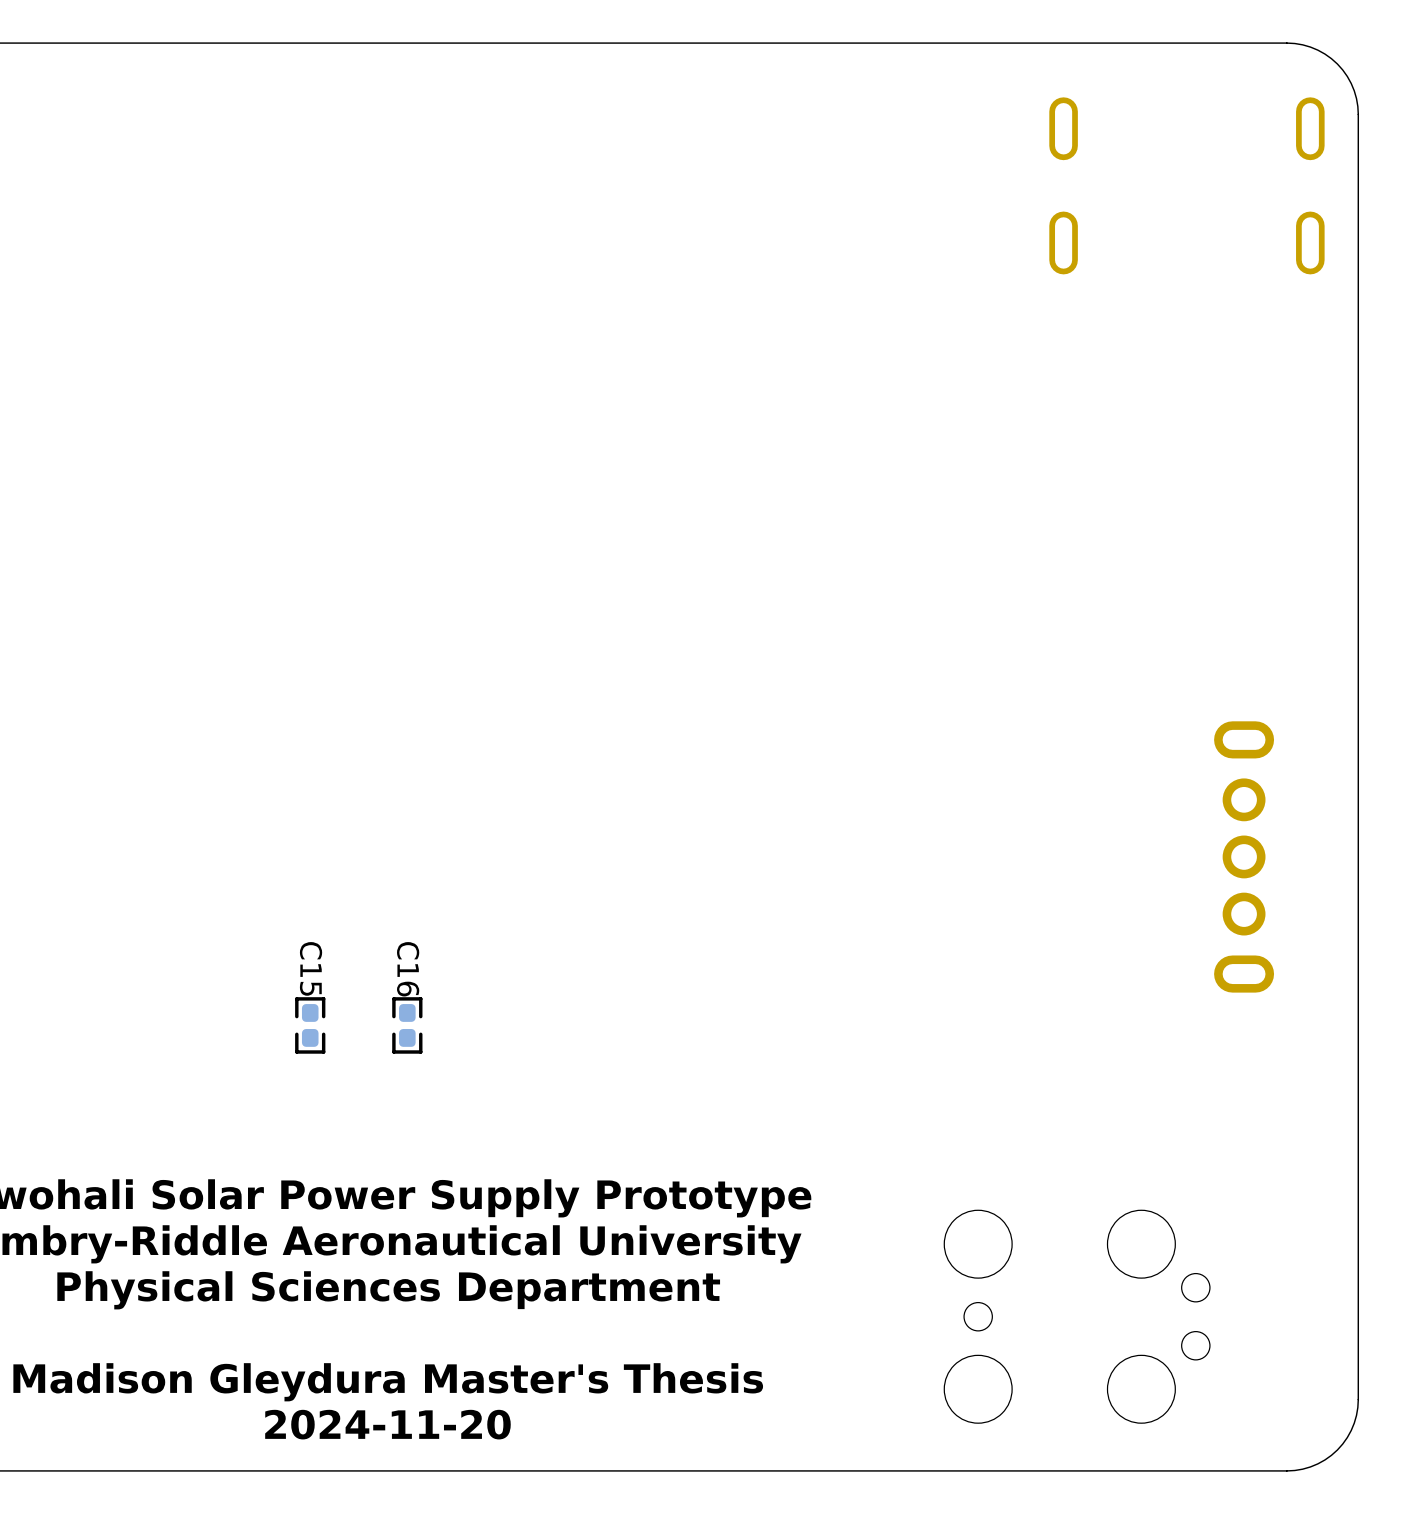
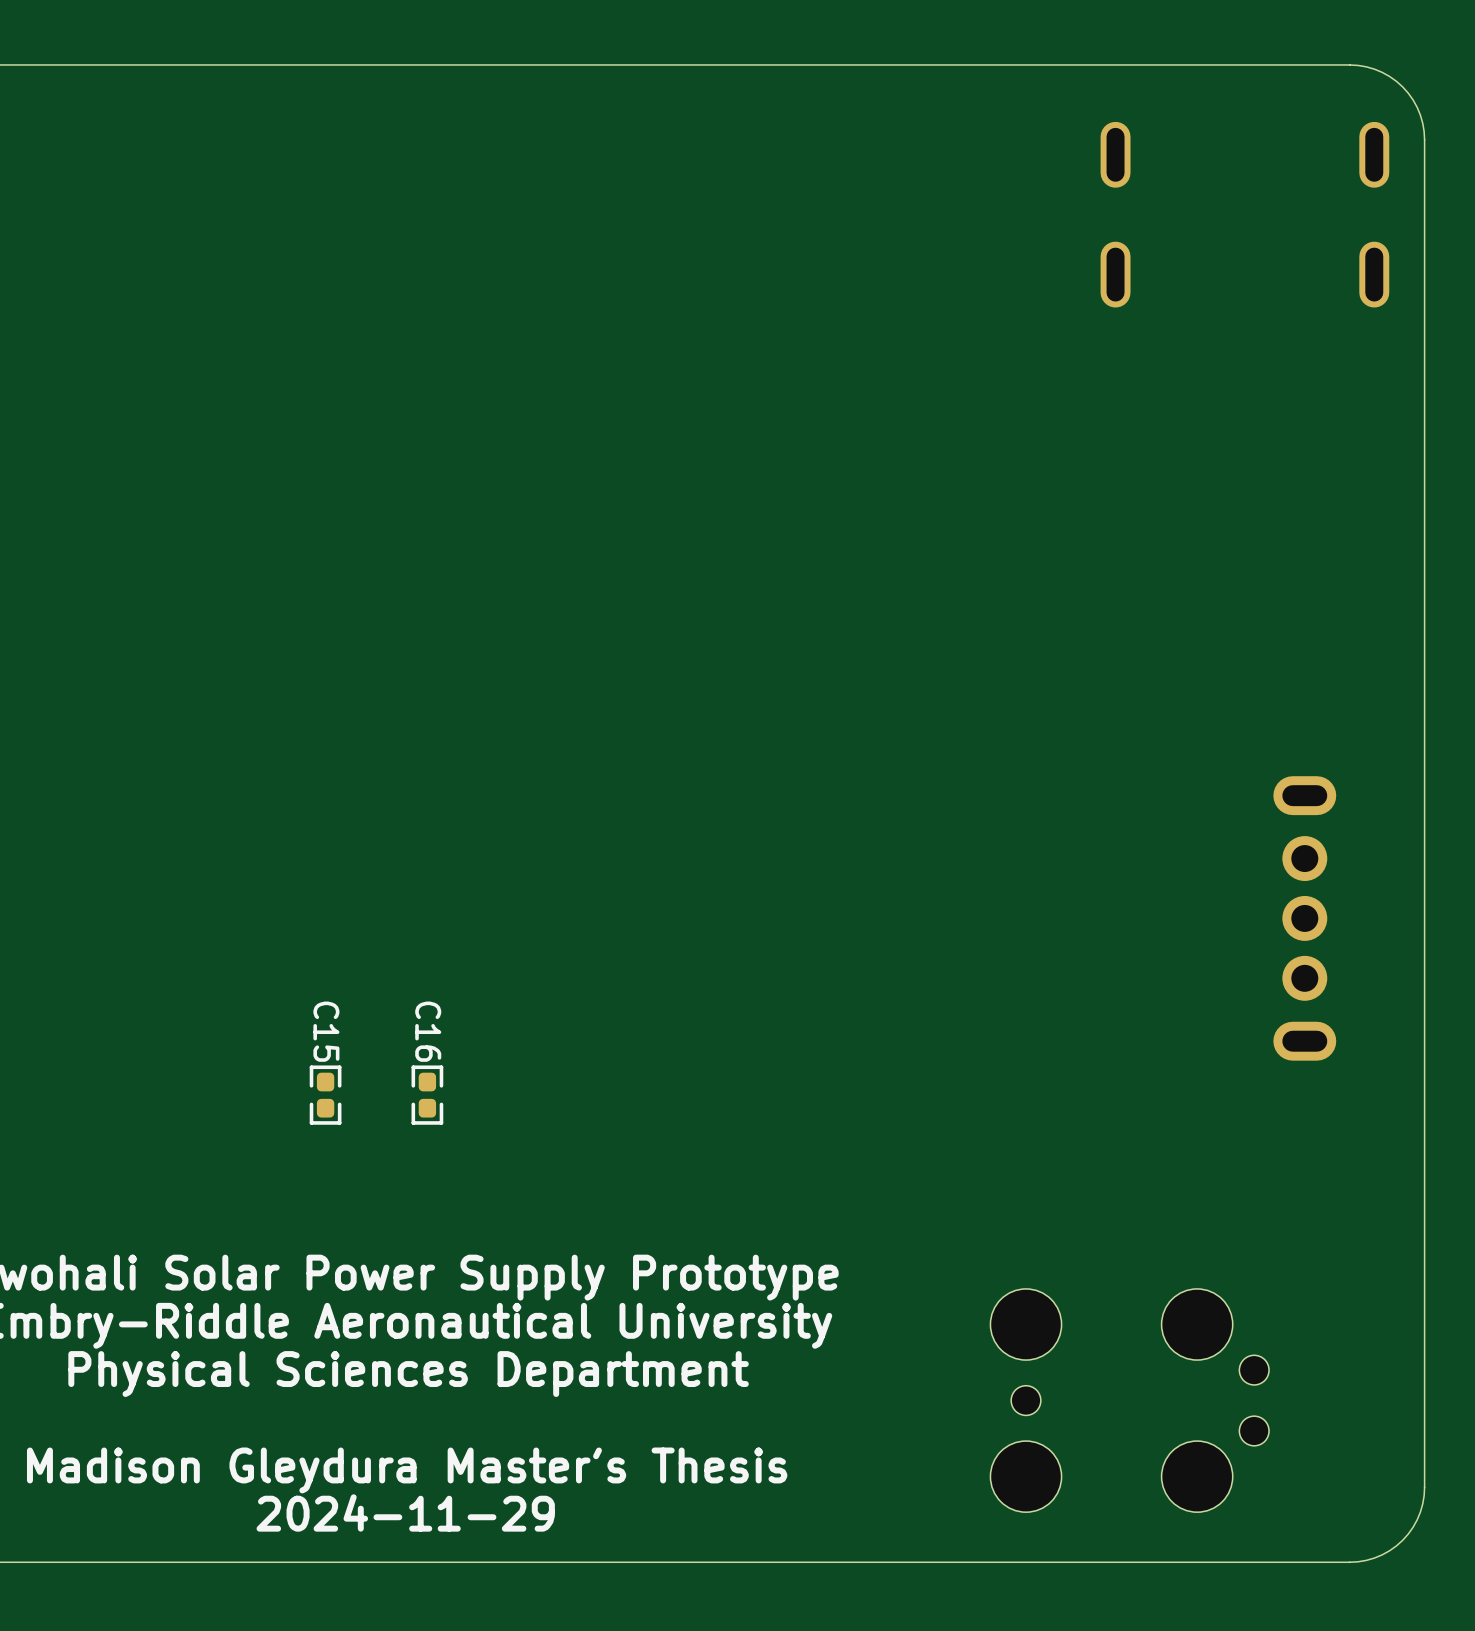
text: 2024-11-20 (387, 1424) -> 2024-11-29 (405, 1512)

